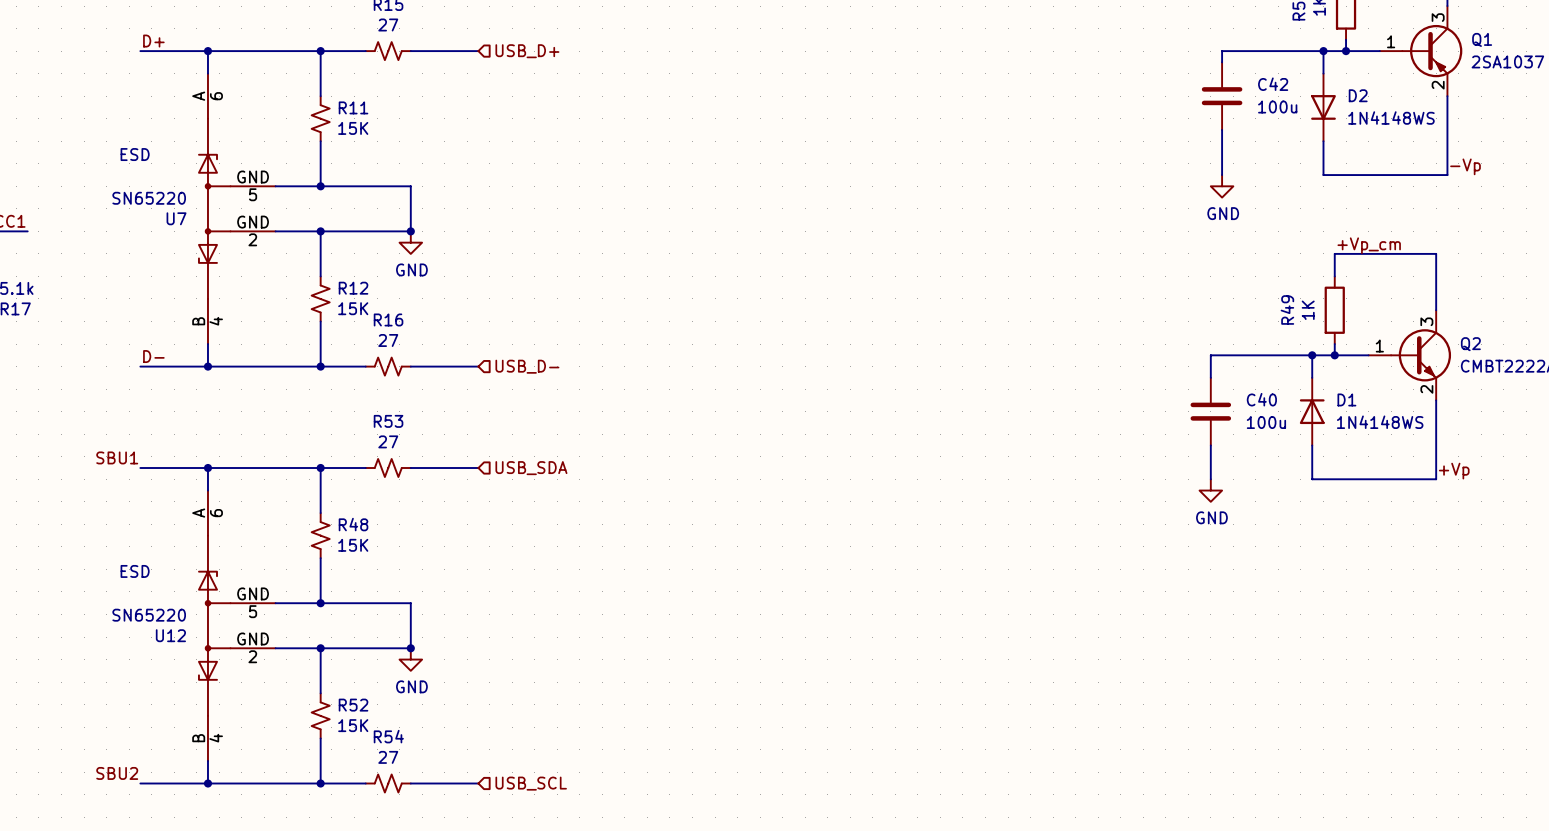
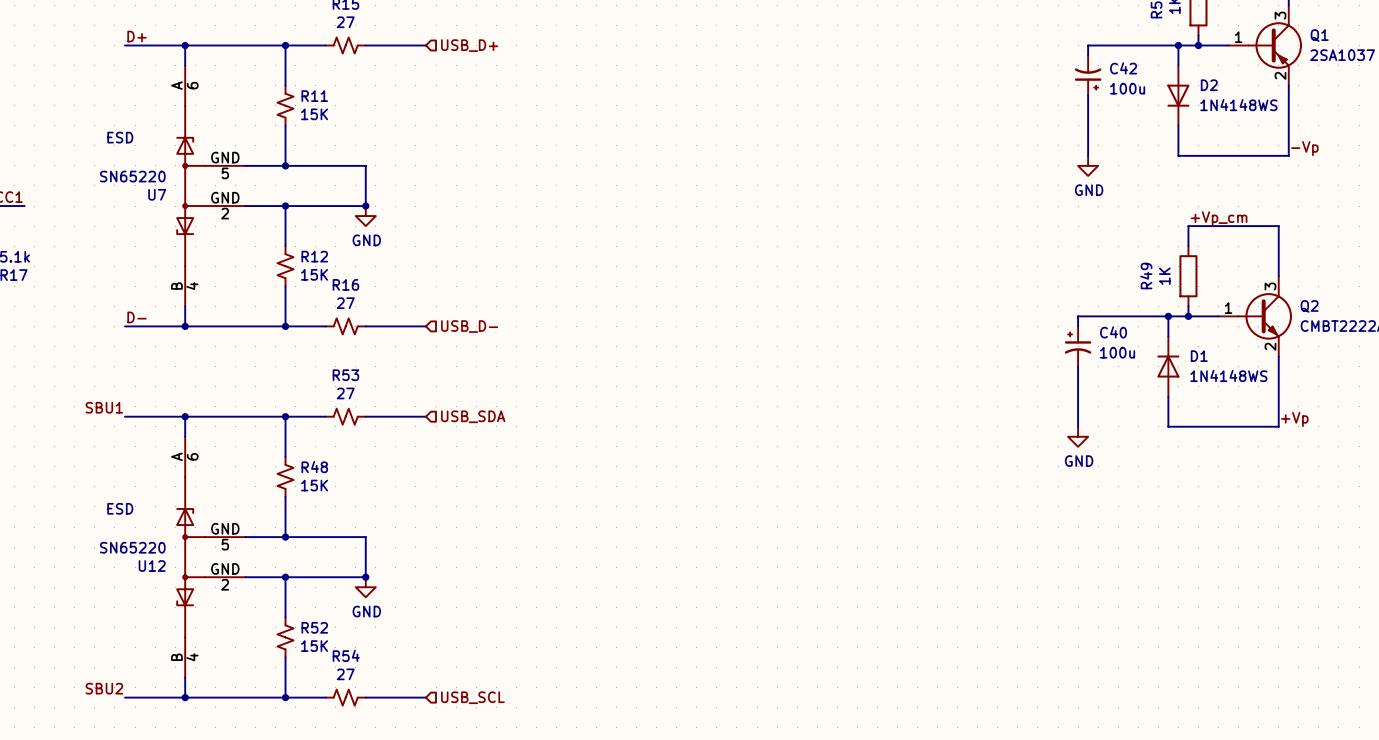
C42 symbol: [1201, 62, 1243, 130] -> [1074, 55, 1102, 96]
C40 symbol: [1190, 377, 1232, 446] -> [1064, 326, 1092, 367]

